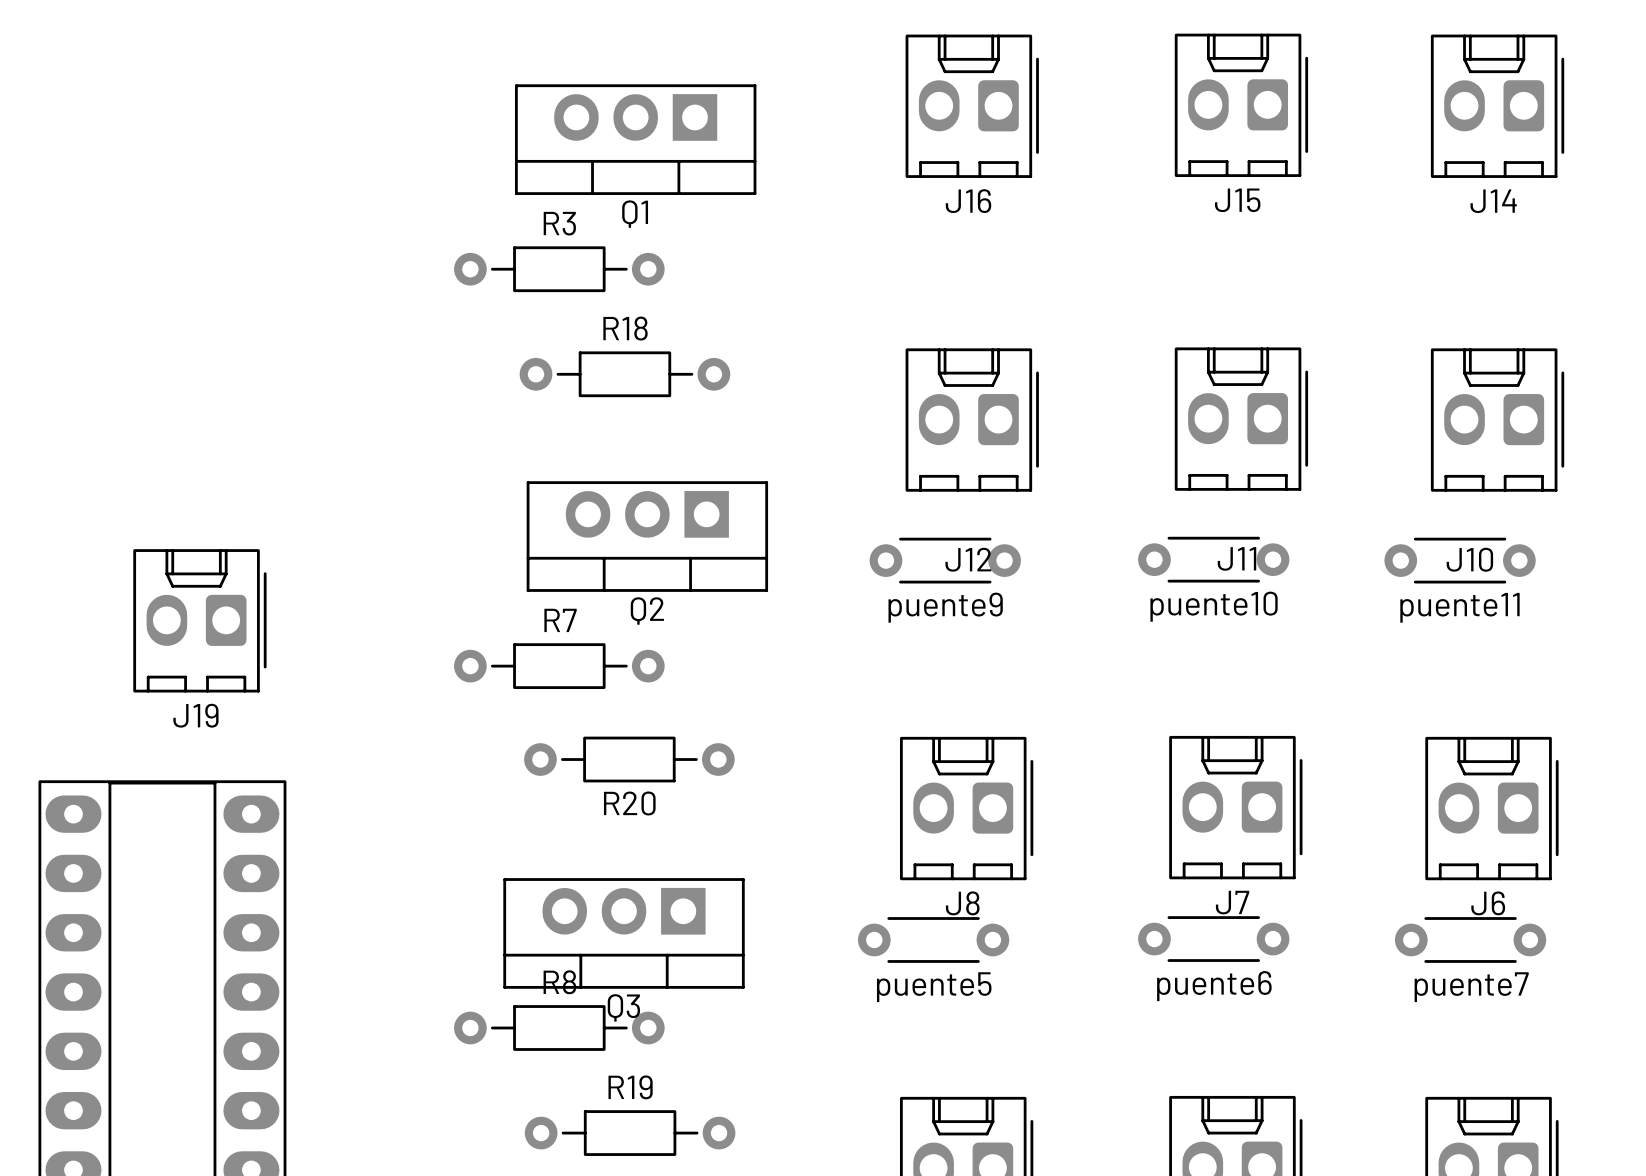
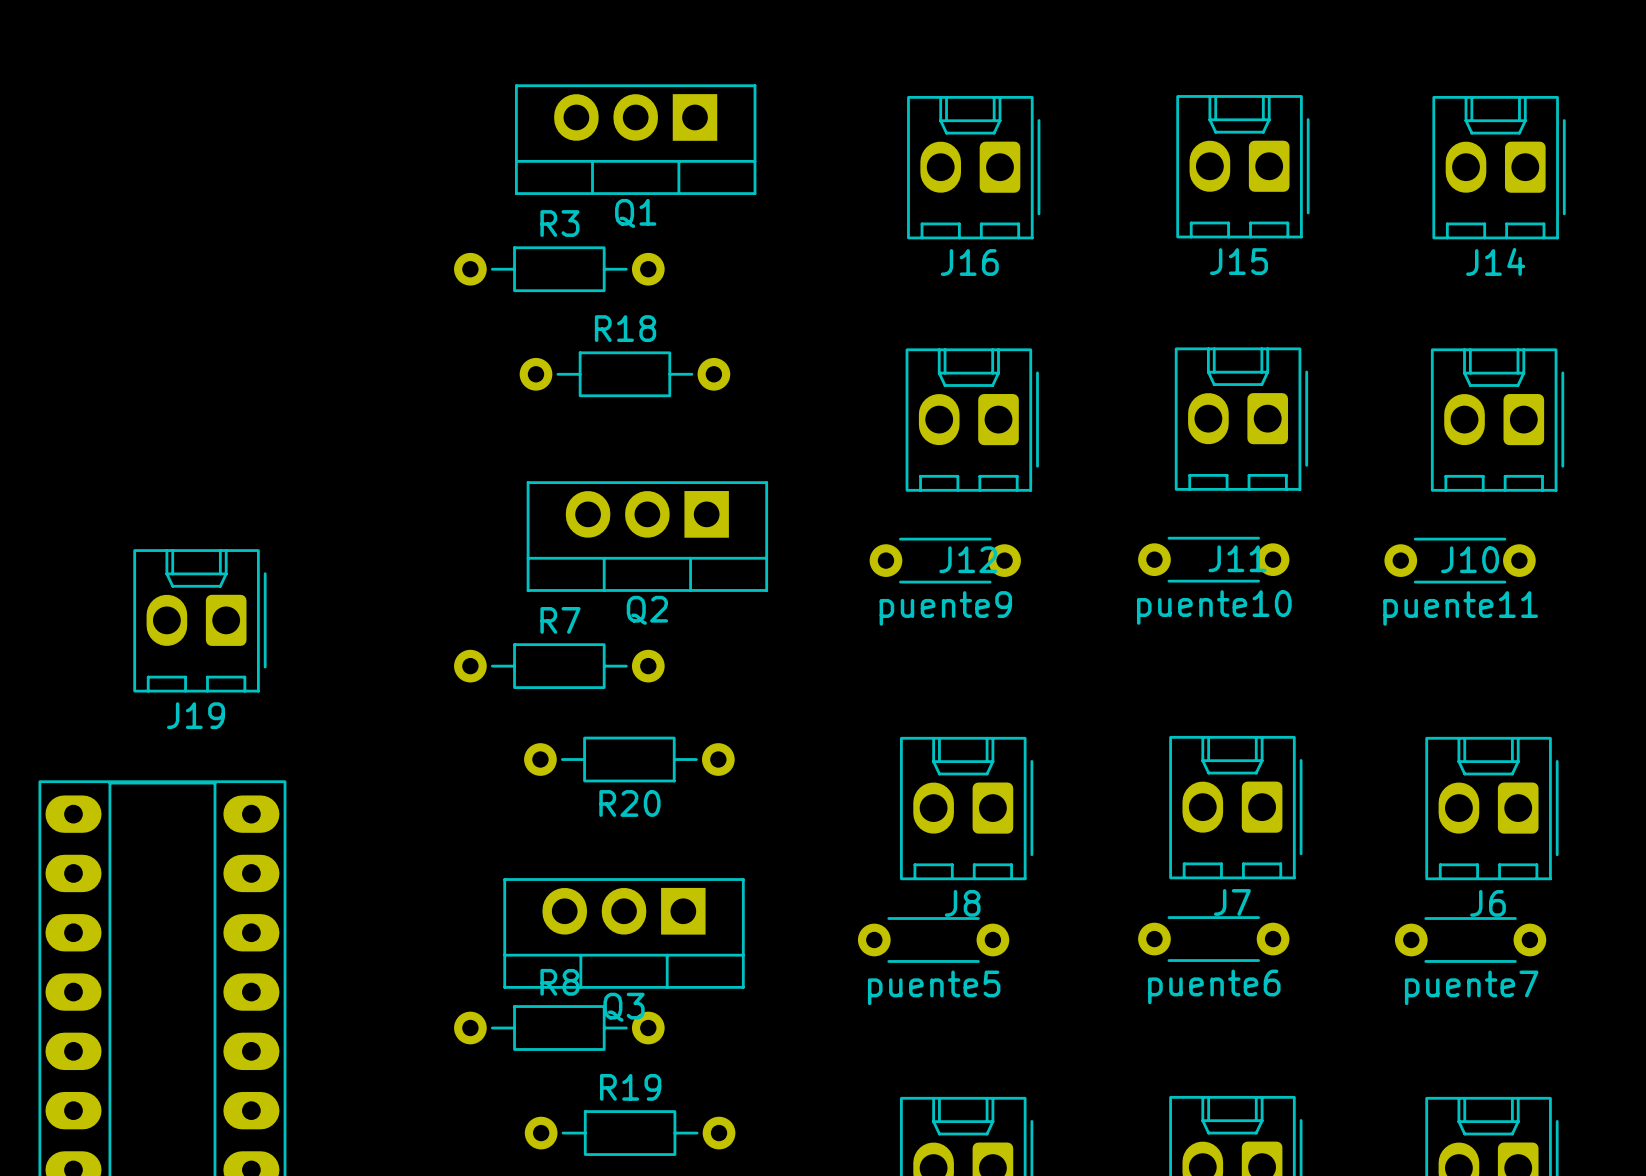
J15 position: (1241, 105) -> (1242, 166)
J16 position: (972, 106) -> (973, 167)
J14 position: (1497, 106) -> (1499, 167)

